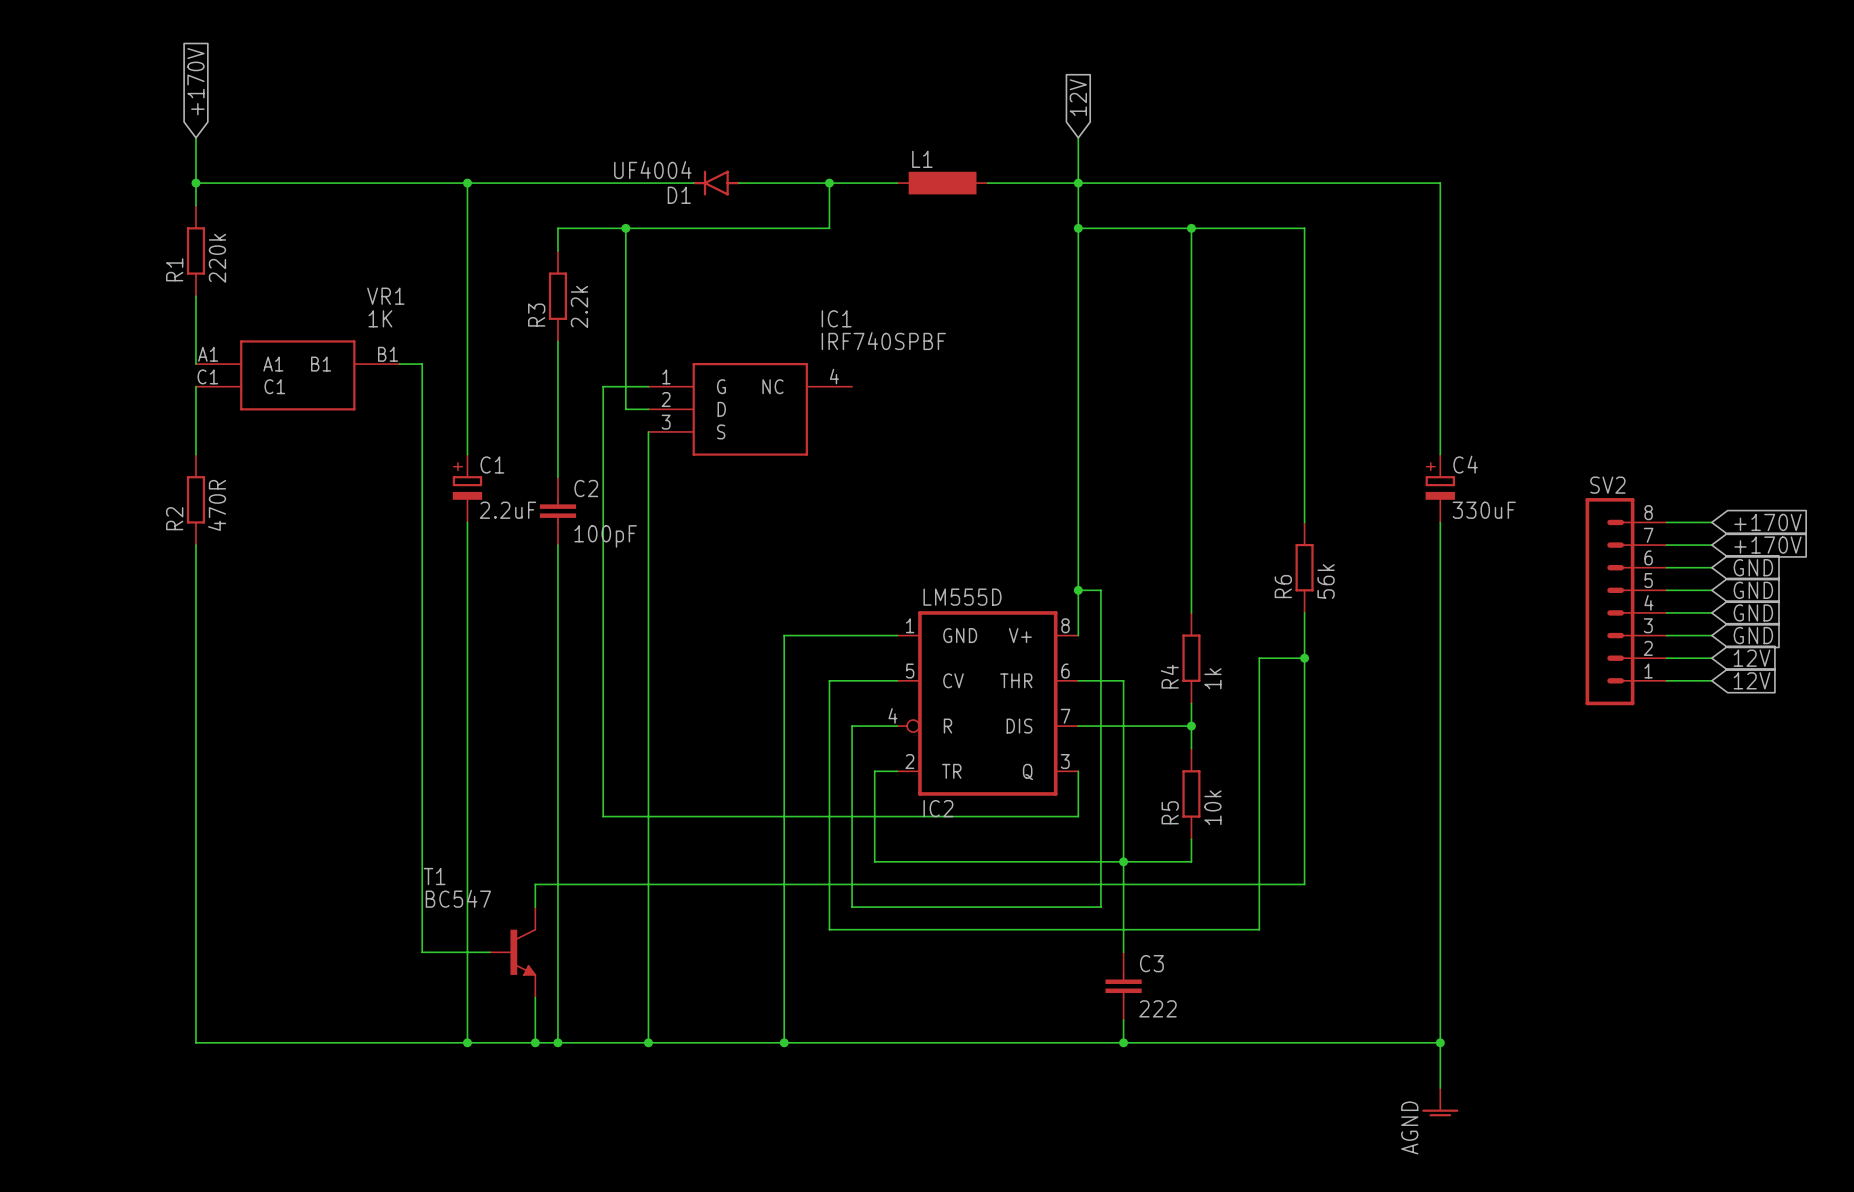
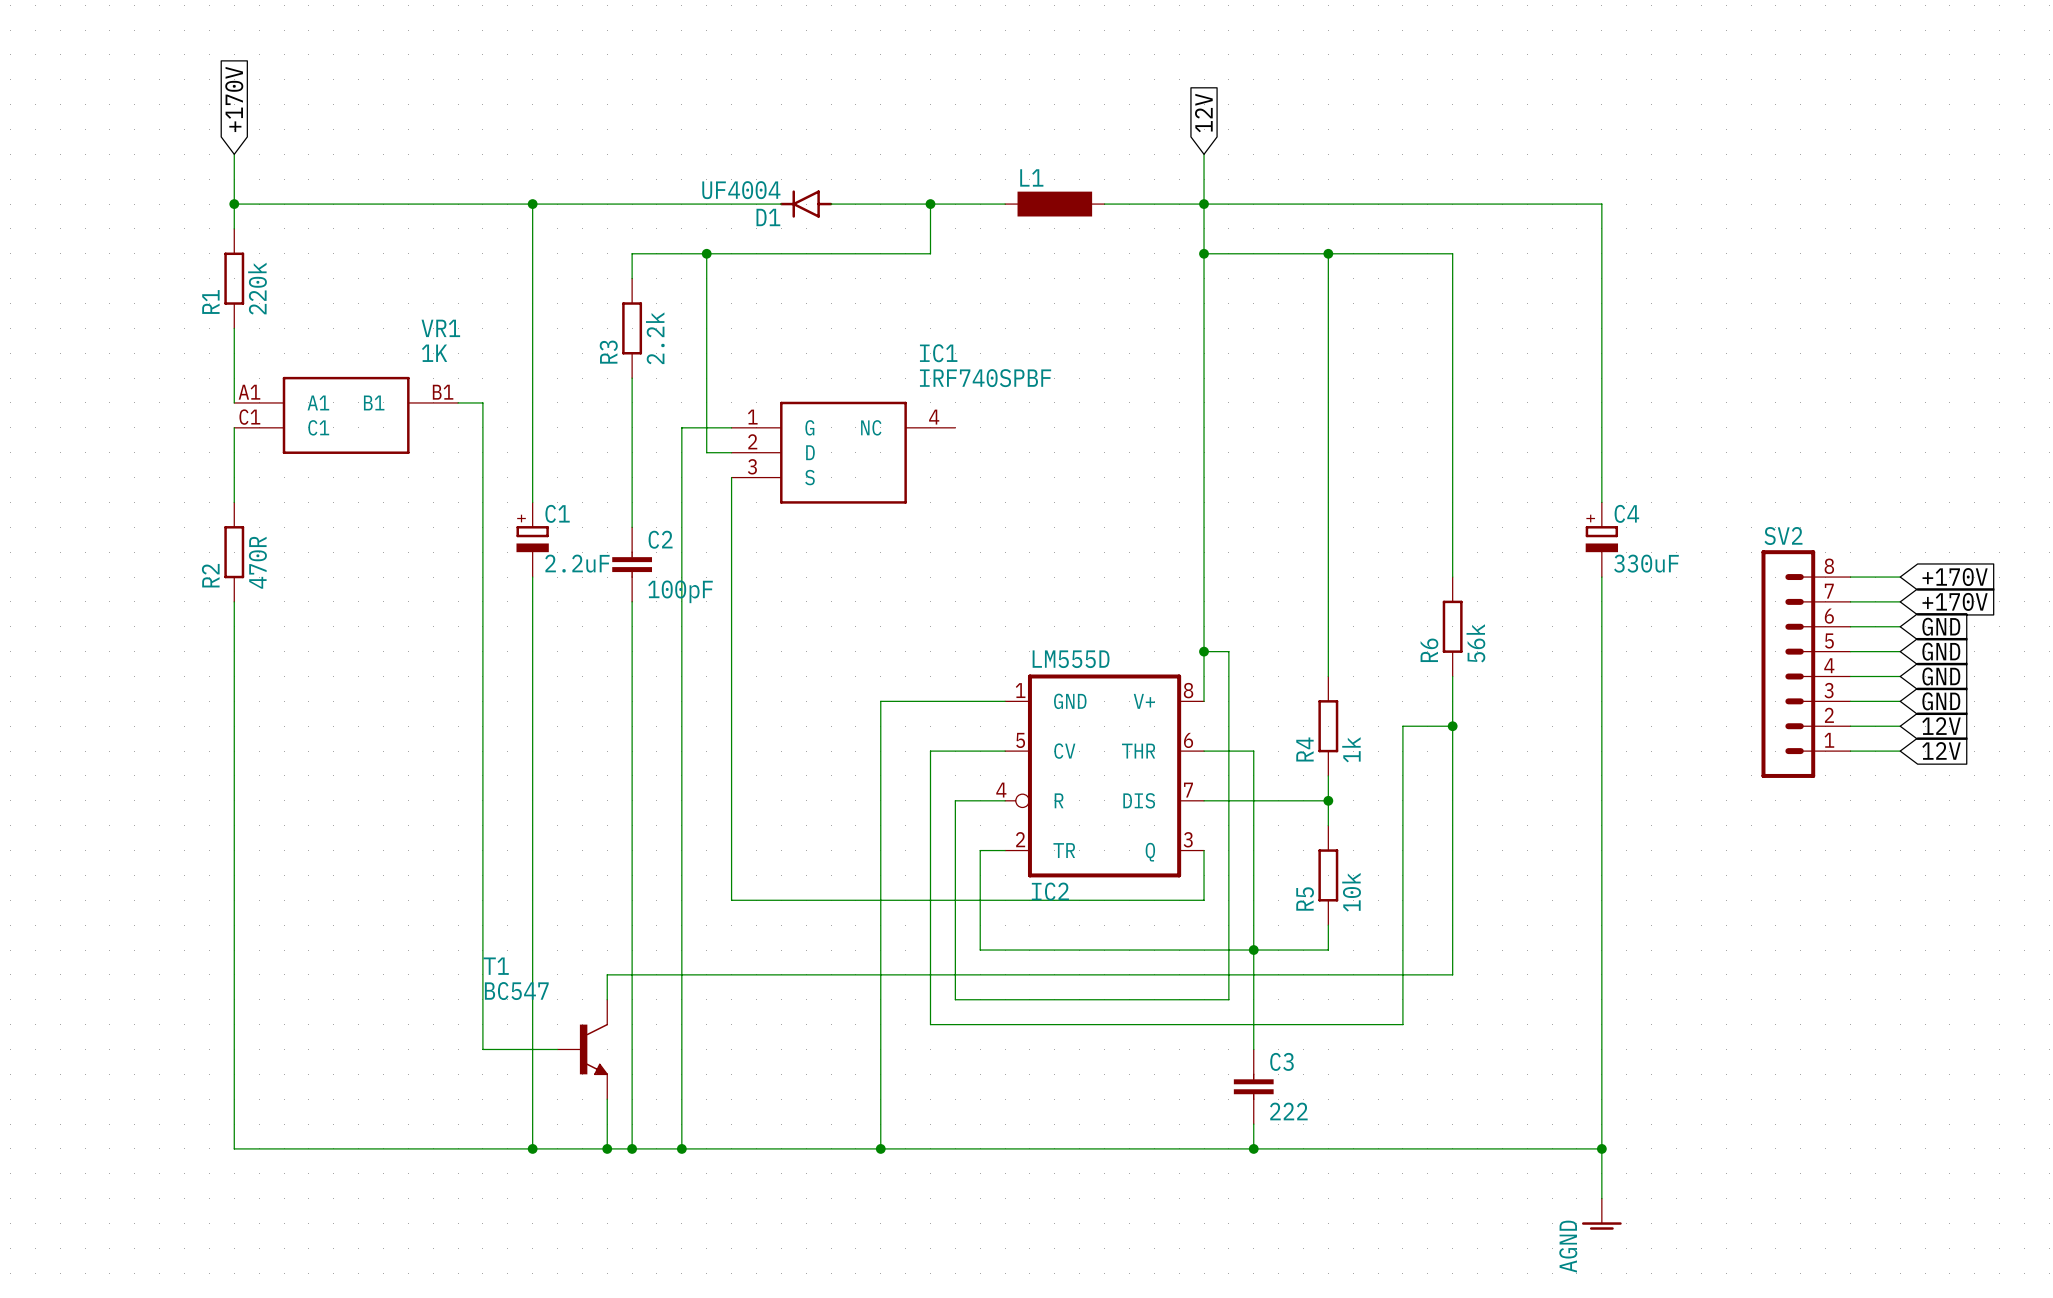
wire: (603, 816) (648, 816) (648, 1042) -> (681, 900) (681, 1148)
junction position: (648, 1042) -> (681, 1148)

